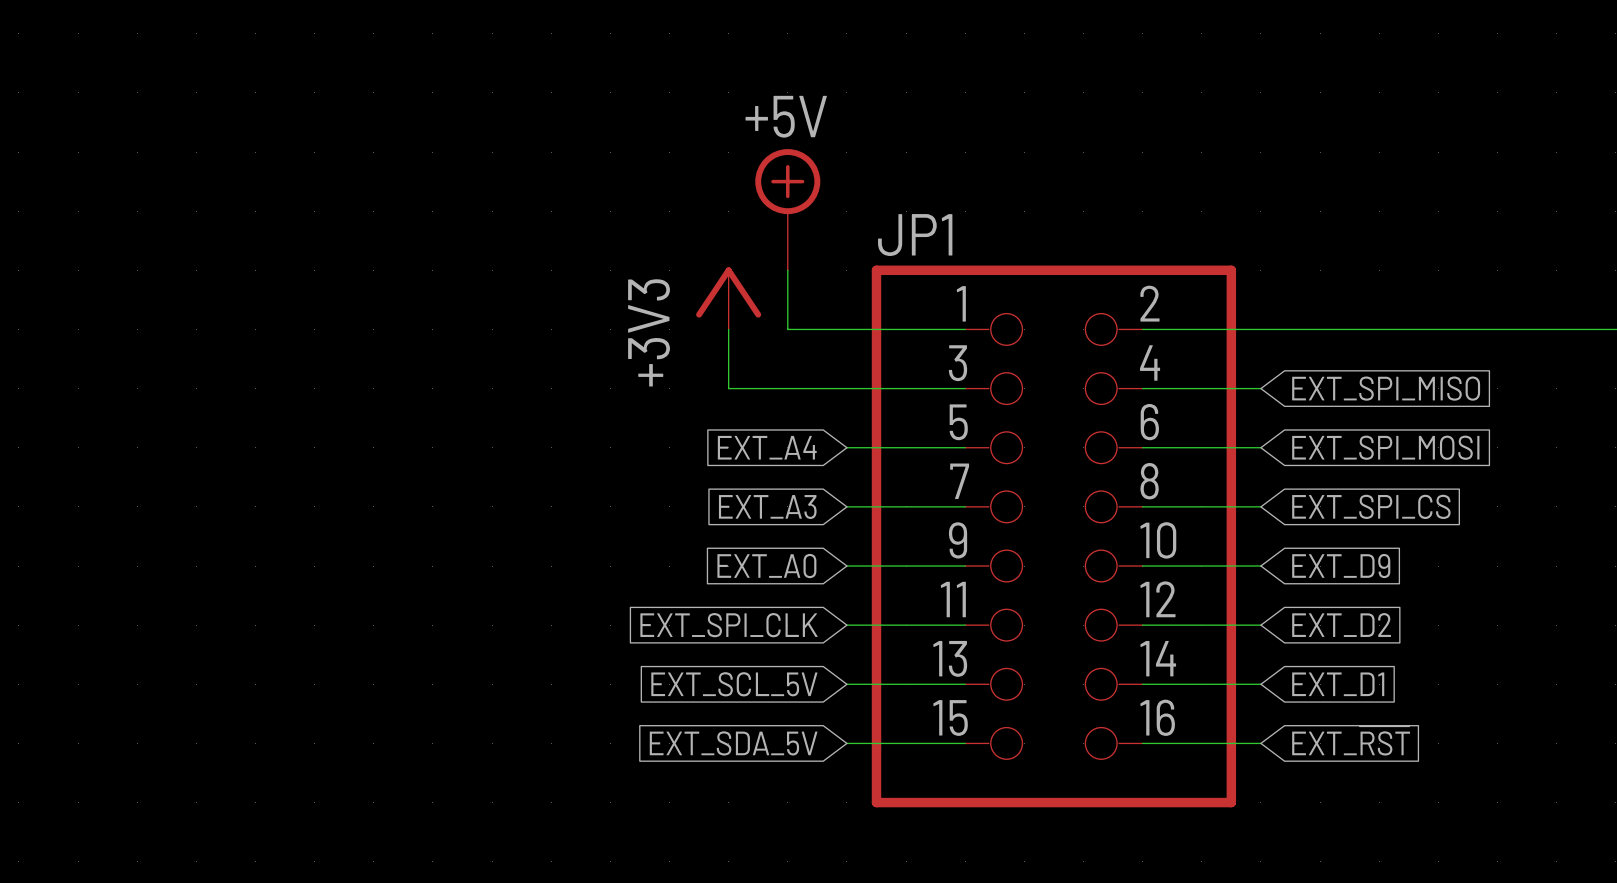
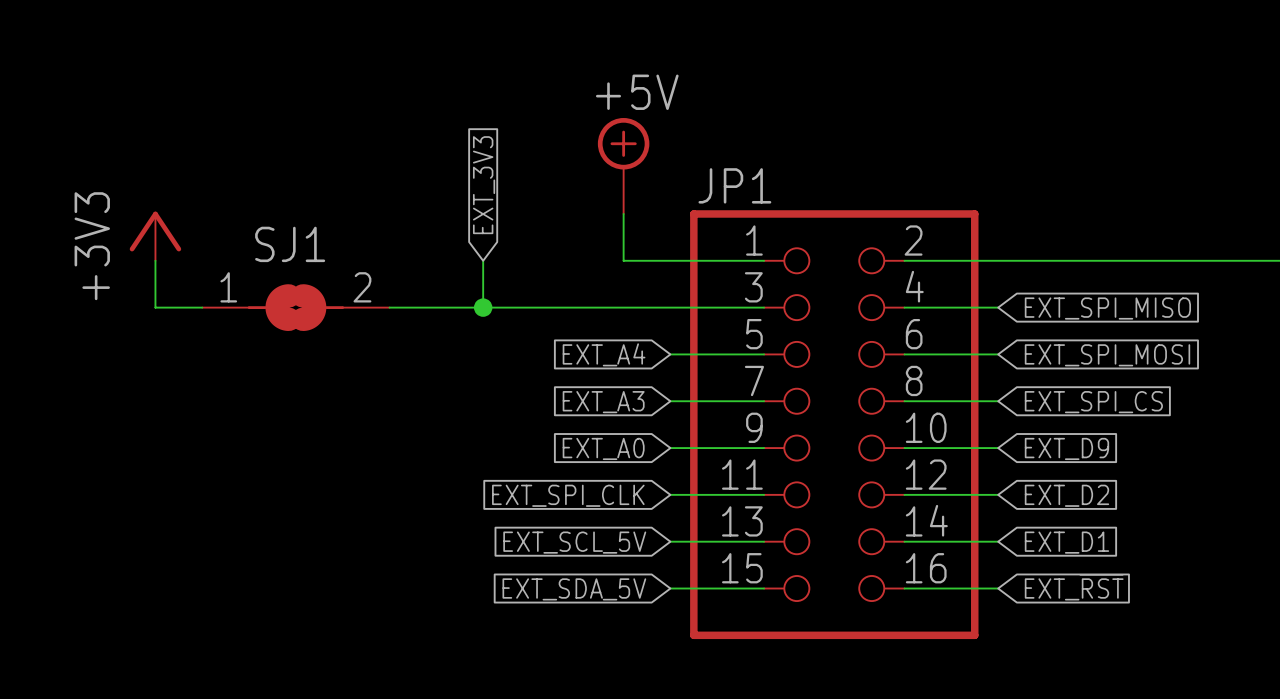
global label: none -> EXT_3V3 (484, 185)
power symbol position: +3V3 (728, 298) -> +3V3 (155, 236)
wire: none -> (155, 260) (155, 307) (202, 307)
wire: none -> (483, 260) (483, 307)
wire: (728, 329) (728, 388) -> (389, 307) (576, 307)
SJ1: none -> (295, 307)
junction: none -> (483, 307)

